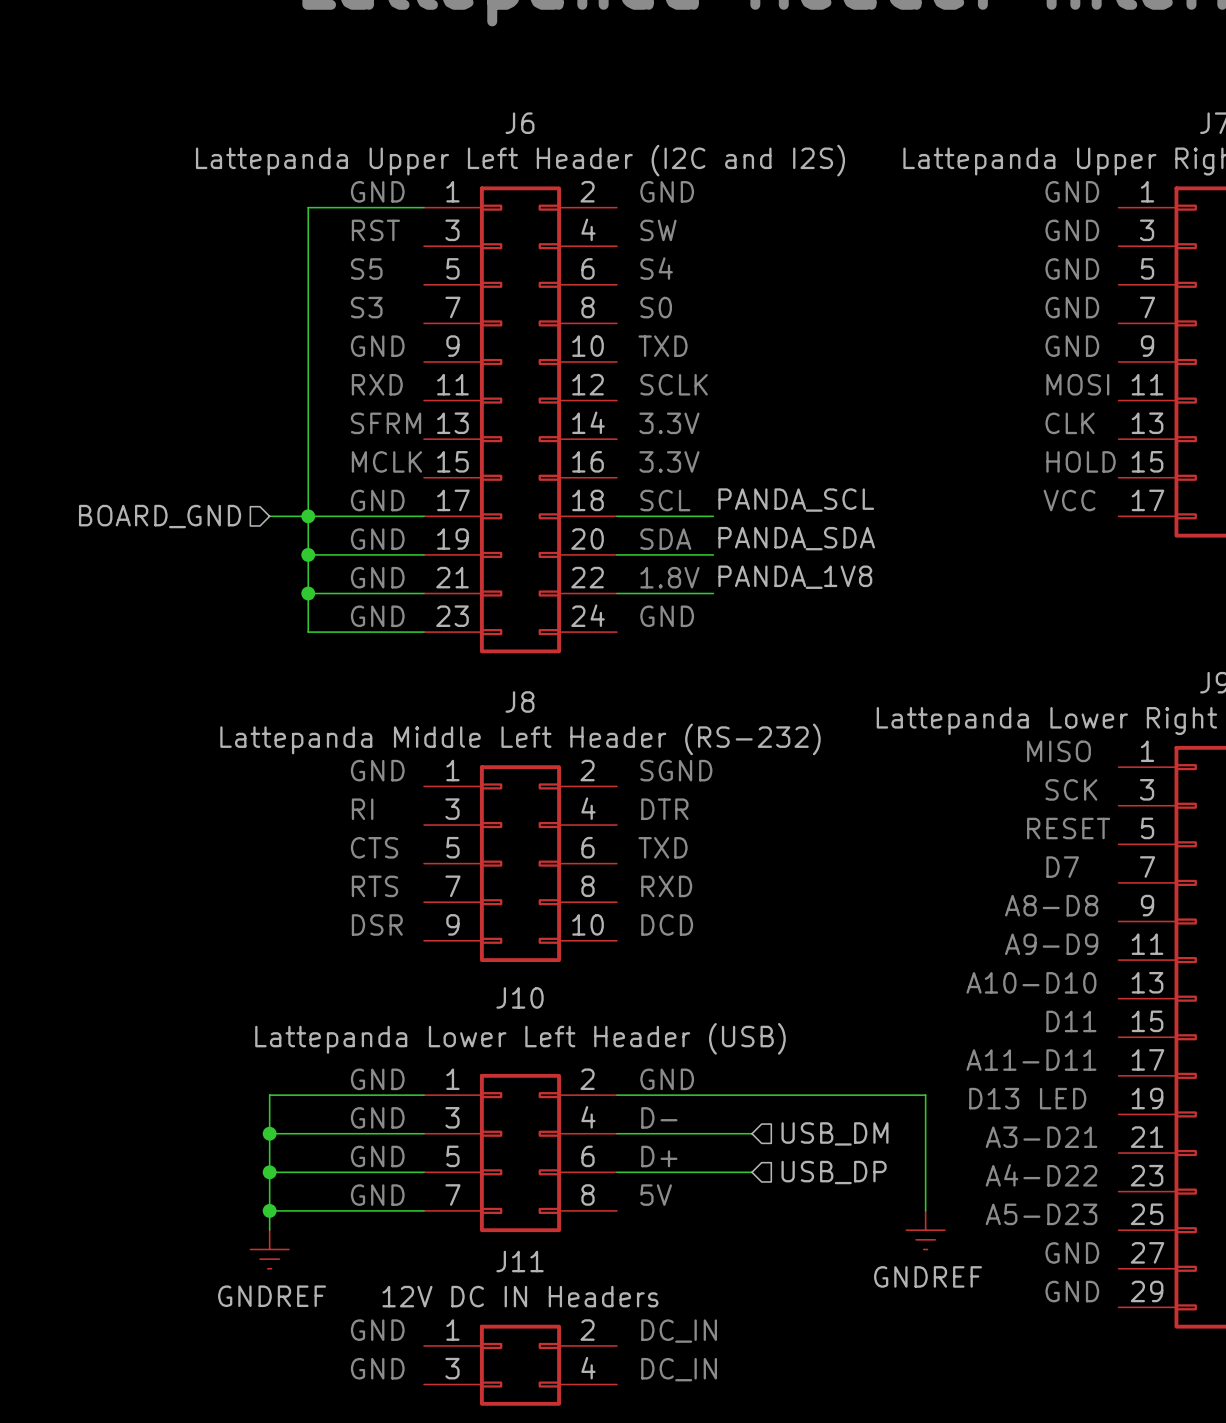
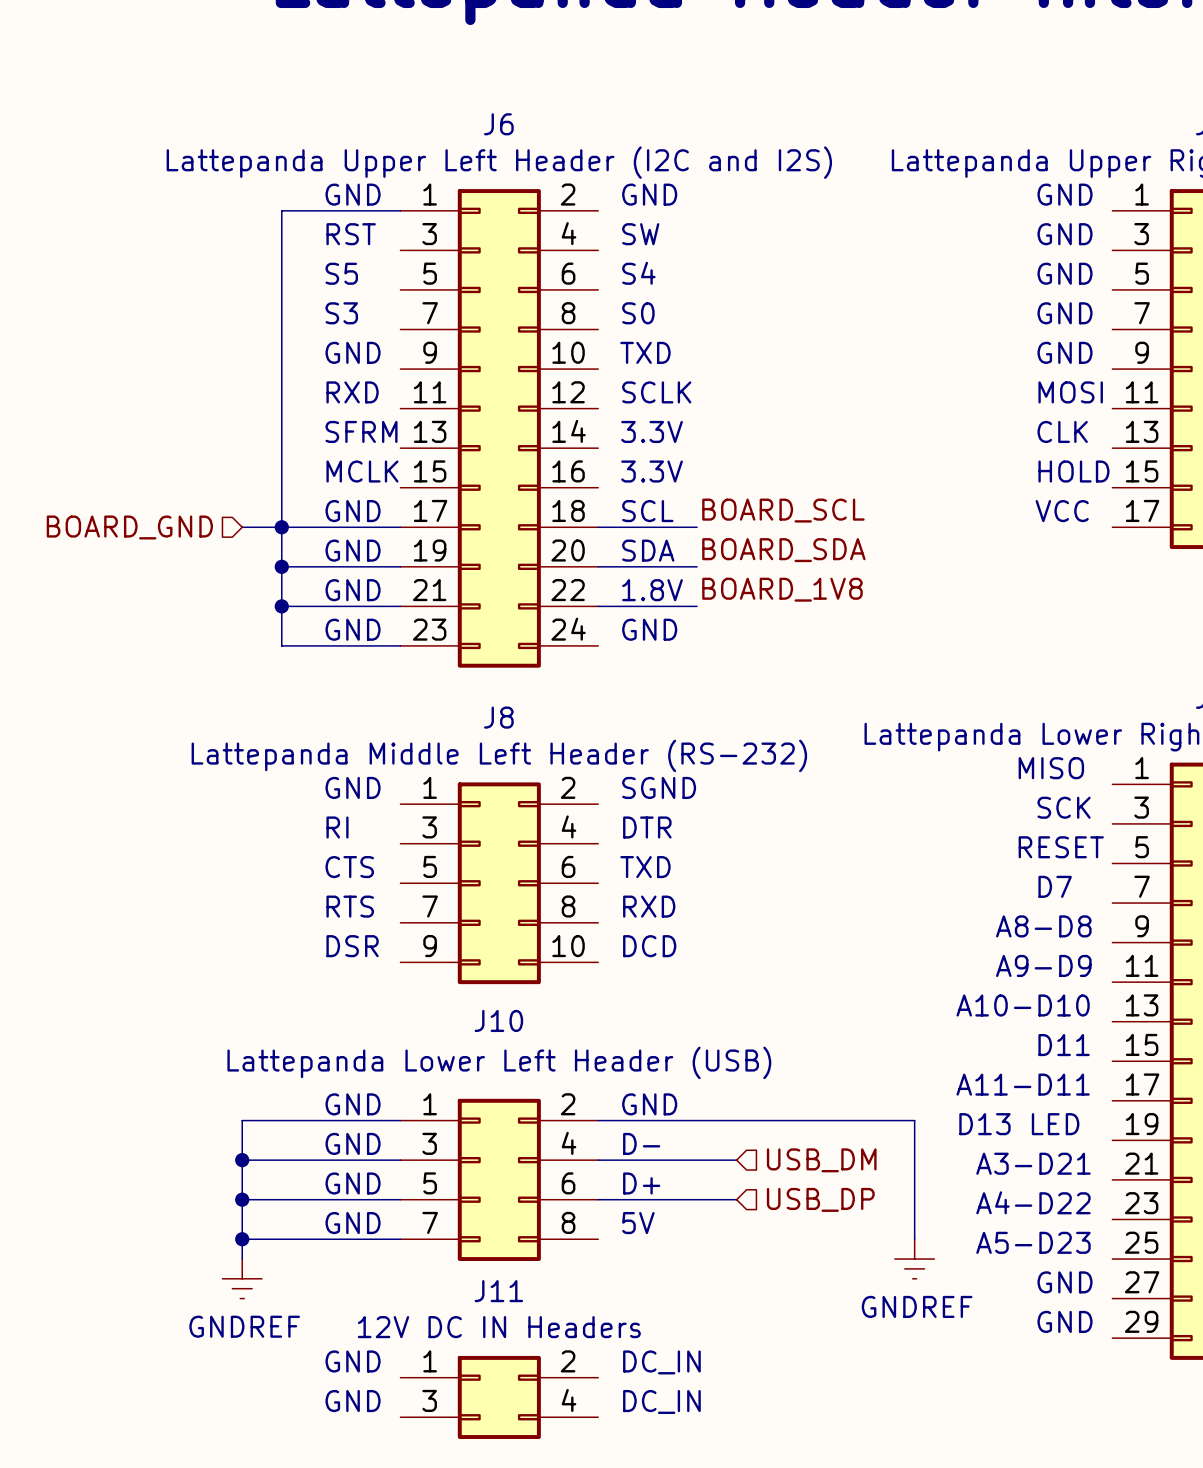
label: PANDA_SCL (796, 500) -> BOARD_SCL (783, 510)
label: PANDA_SDA (796, 538) -> BOARD_SDA (783, 550)
label: PANDA_1V8 (795, 577) -> BOARD_1V8 (782, 589)

